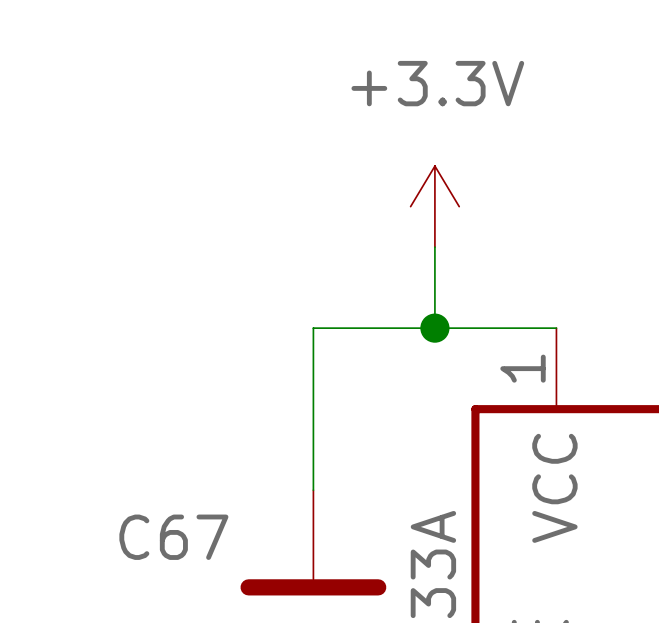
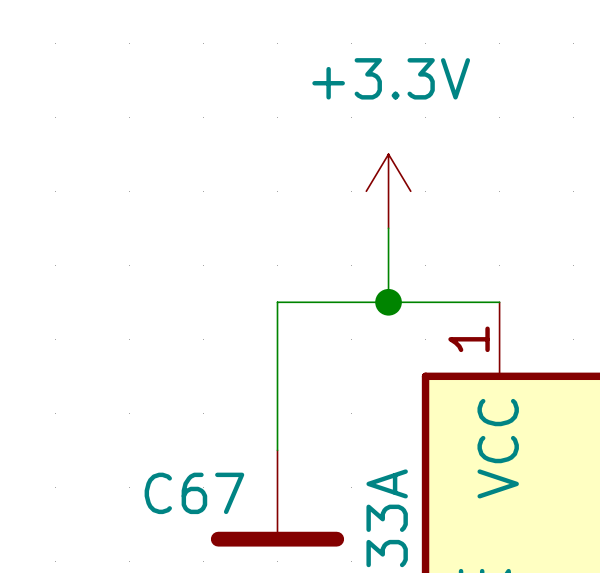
C67 name position: C67 (173, 537) -> C67 (194, 493)

